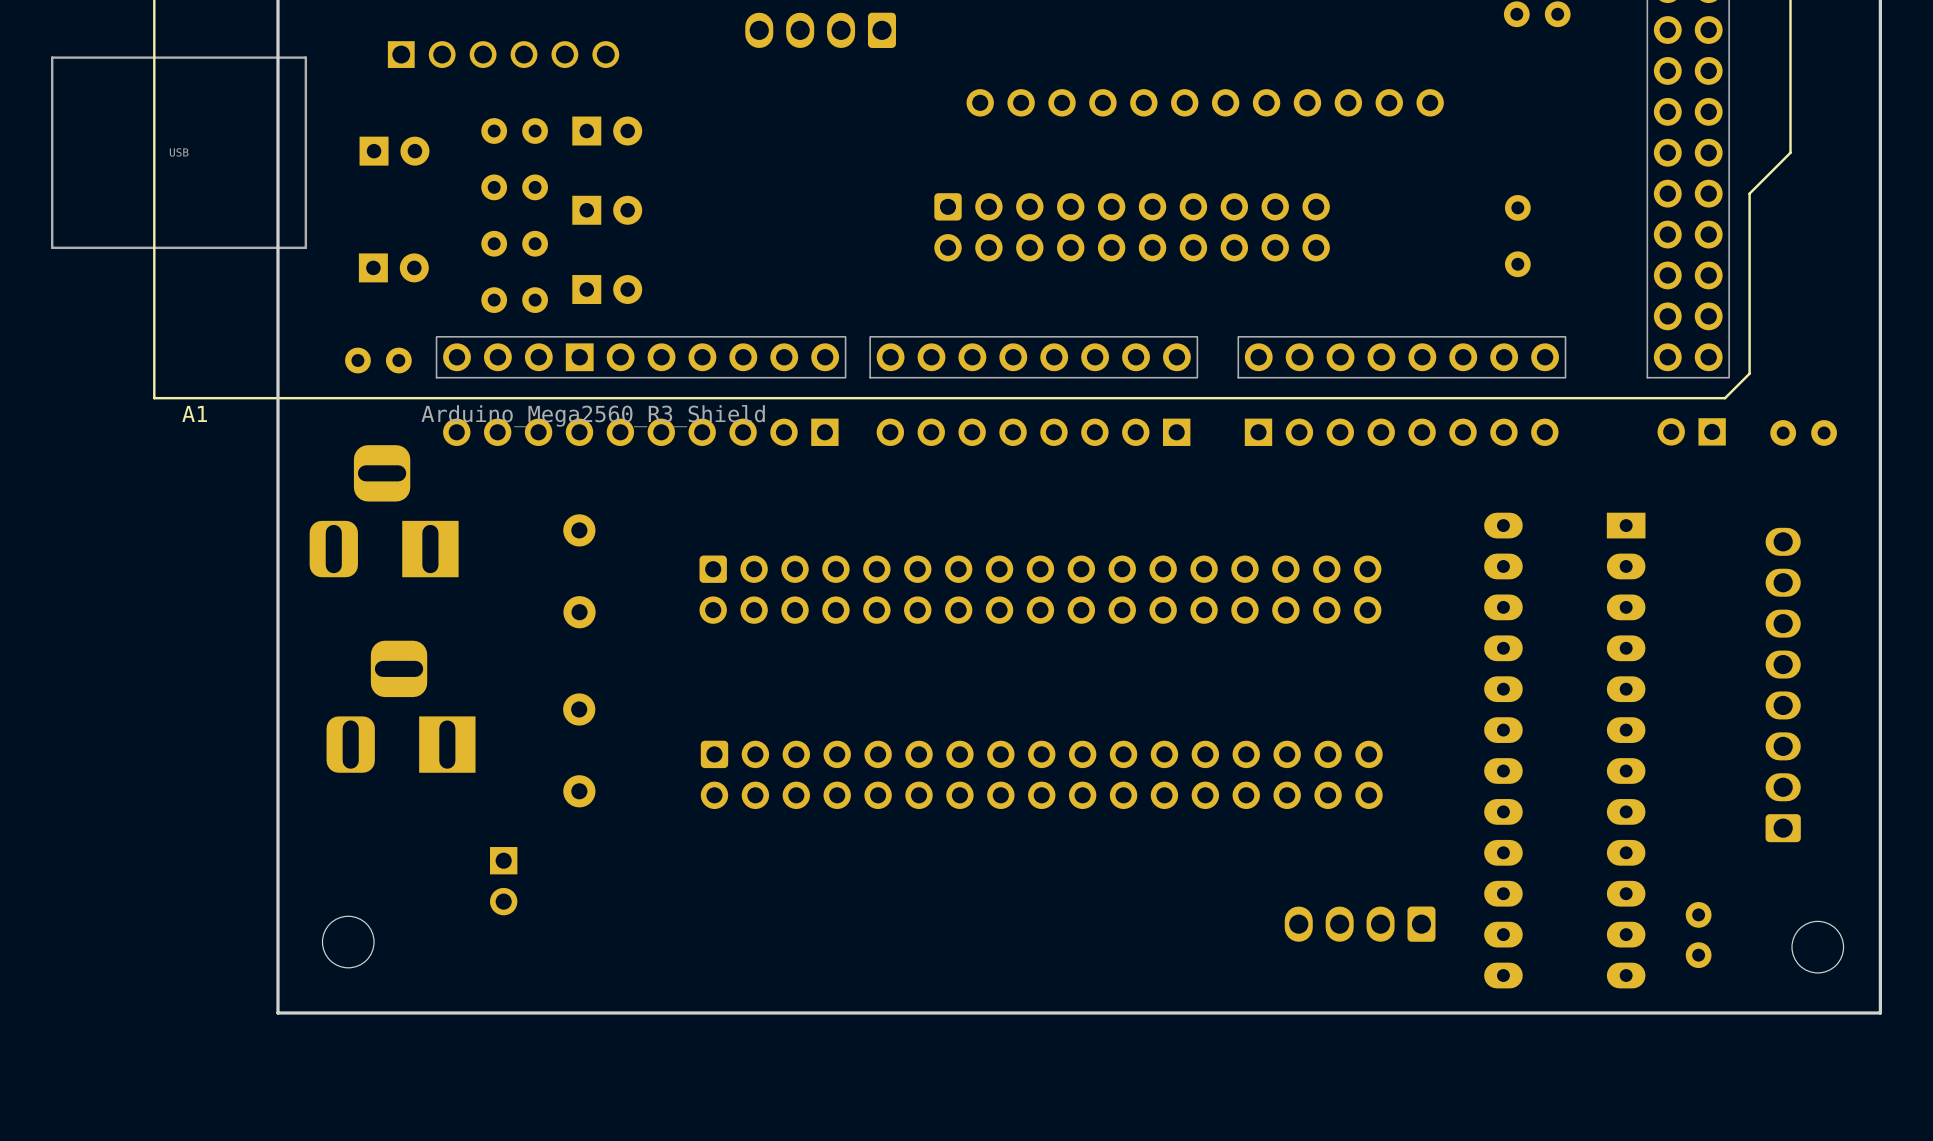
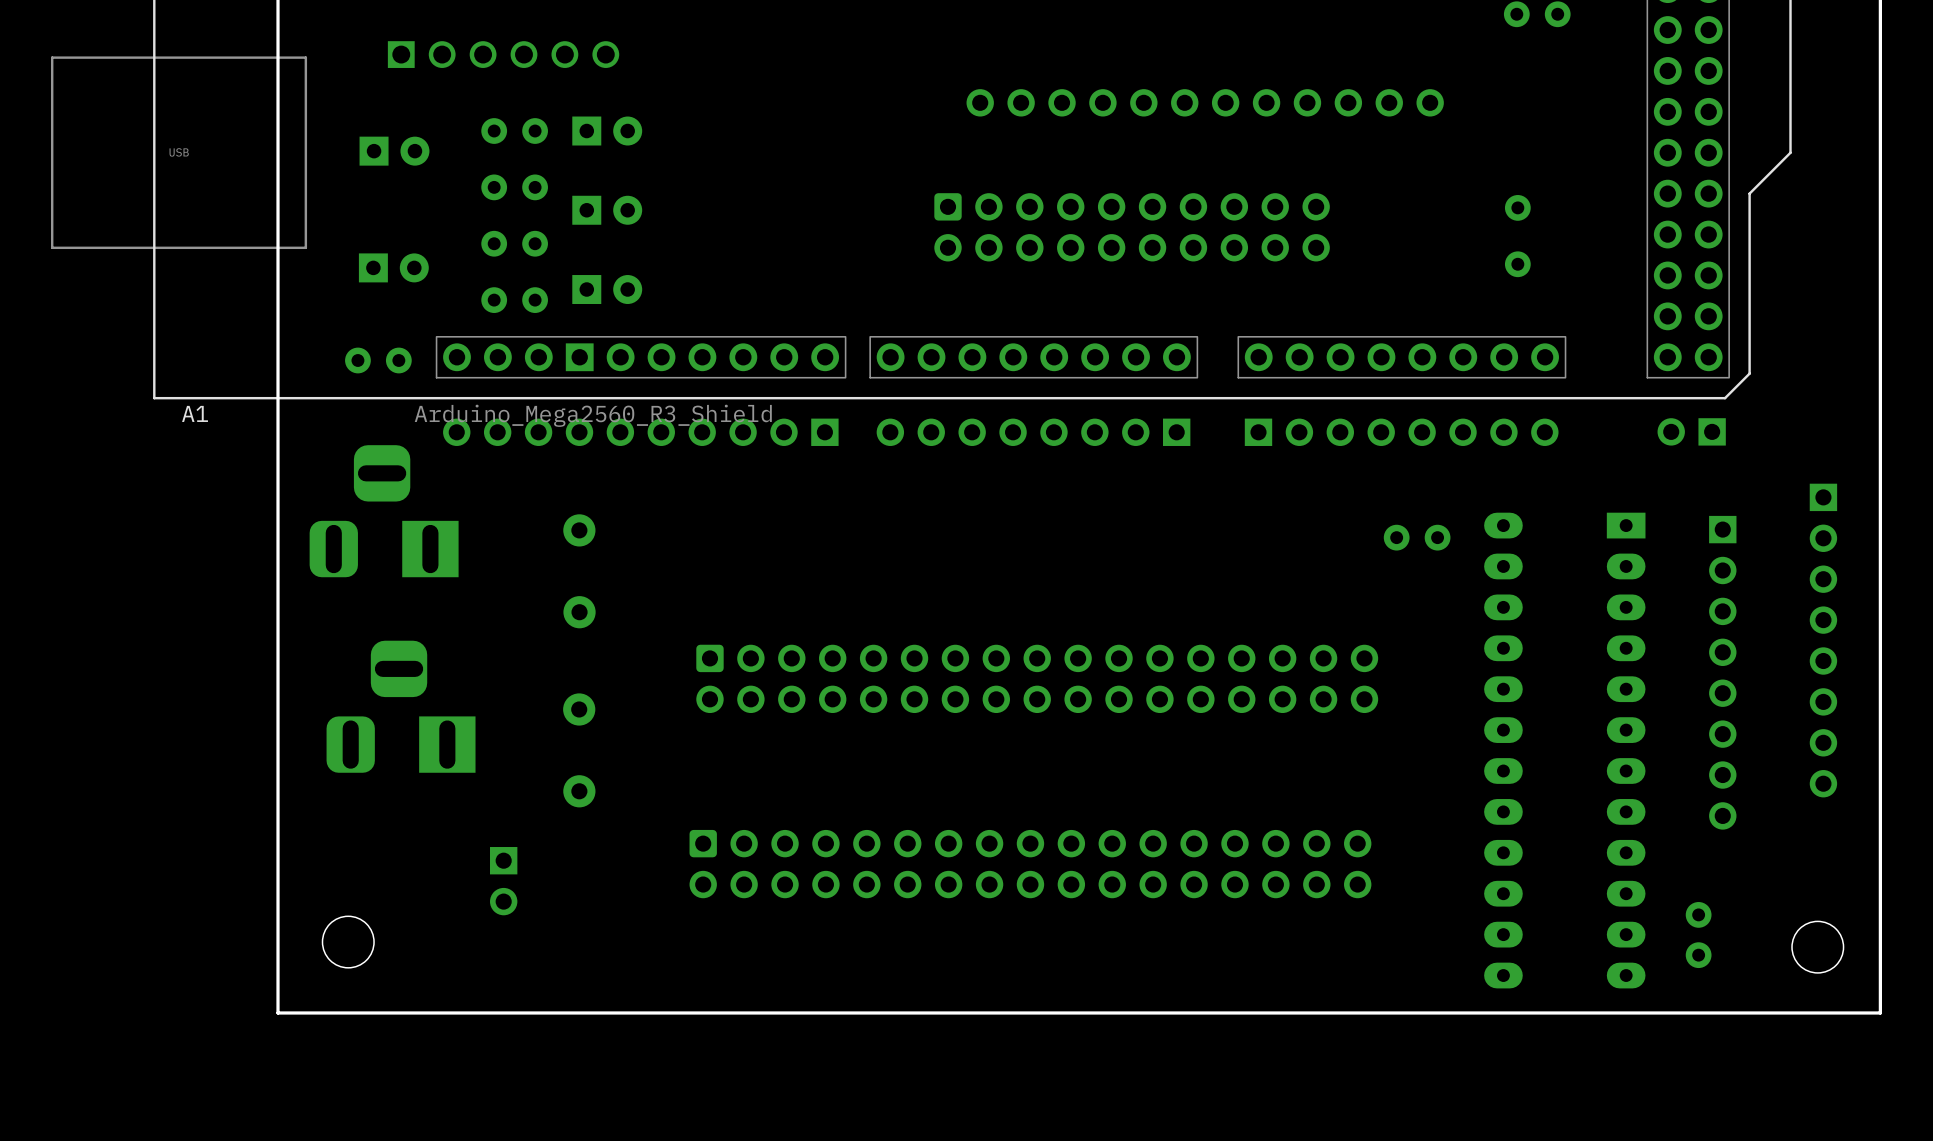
part: (820, 30) -> none
part position: (1803, 432) -> (1417, 537)
part: (1040, 589) -> none
part: none -> (1823, 640)
part: none -> (1722, 672)
part: none -> (1037, 678)
part: (1783, 685) -> none
part: (1041, 774) -> none
part: none -> (1030, 864)
part: (1360, 924) -> none

